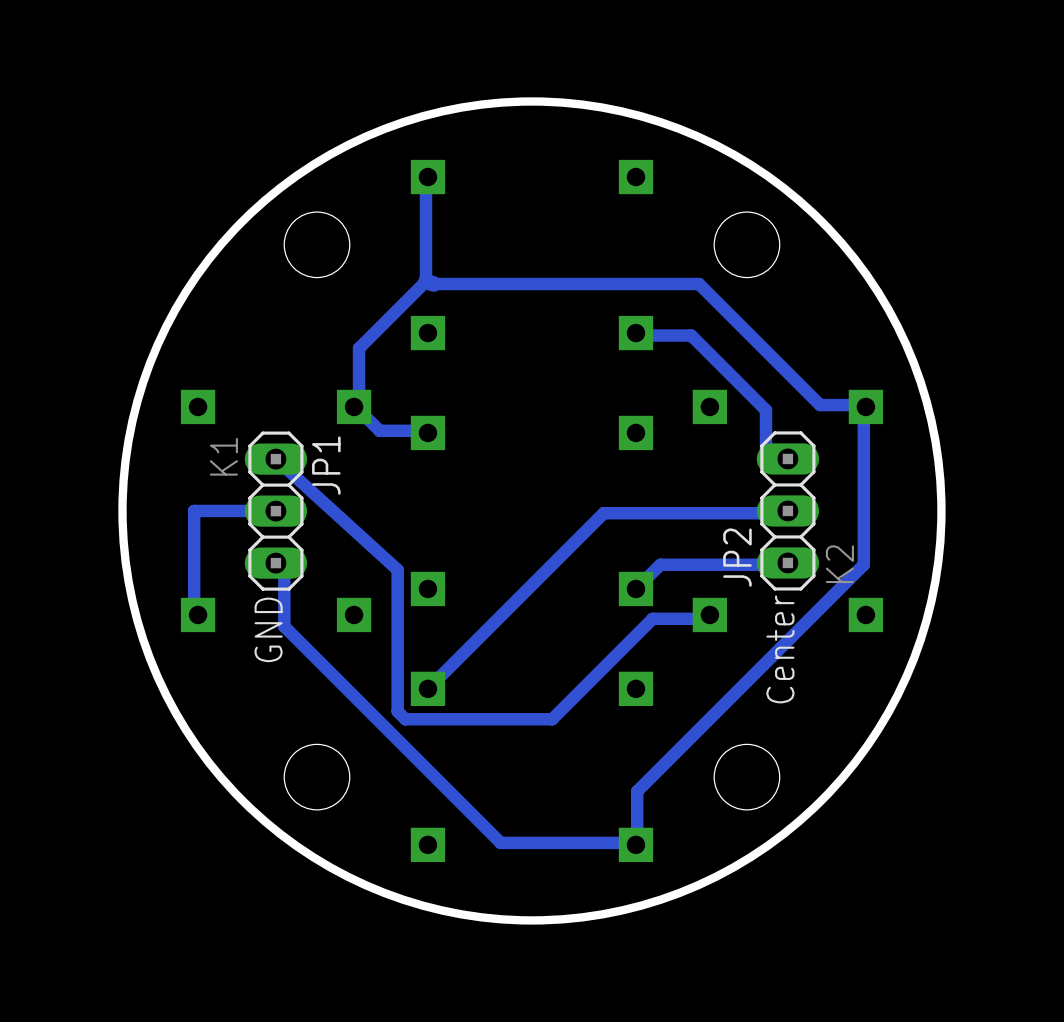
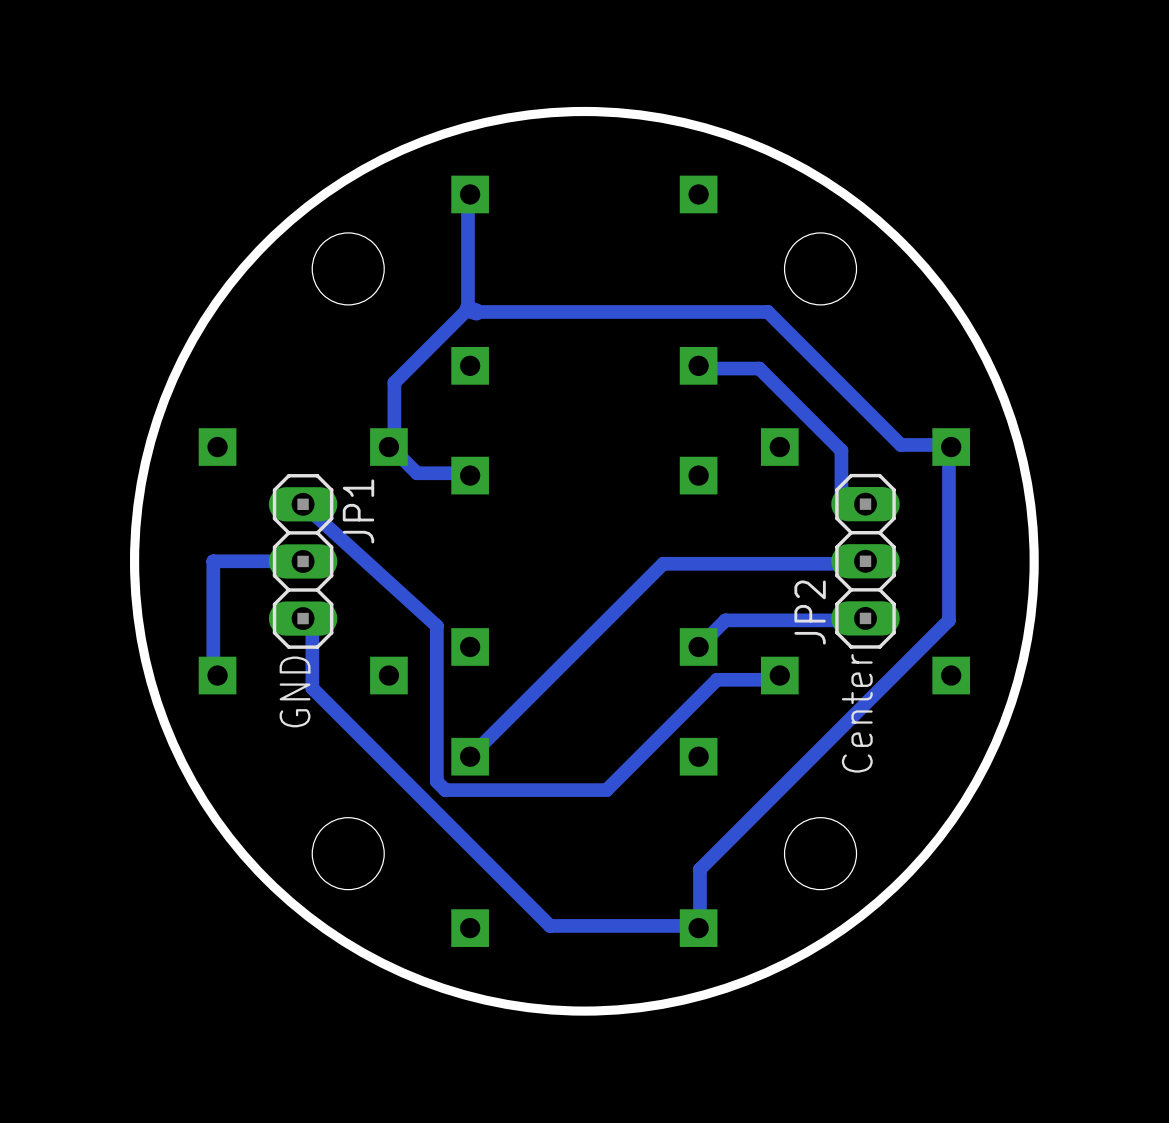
JP1 value: K1 (223, 456) -> none
JP2 value: K2 (839, 564) -> none

